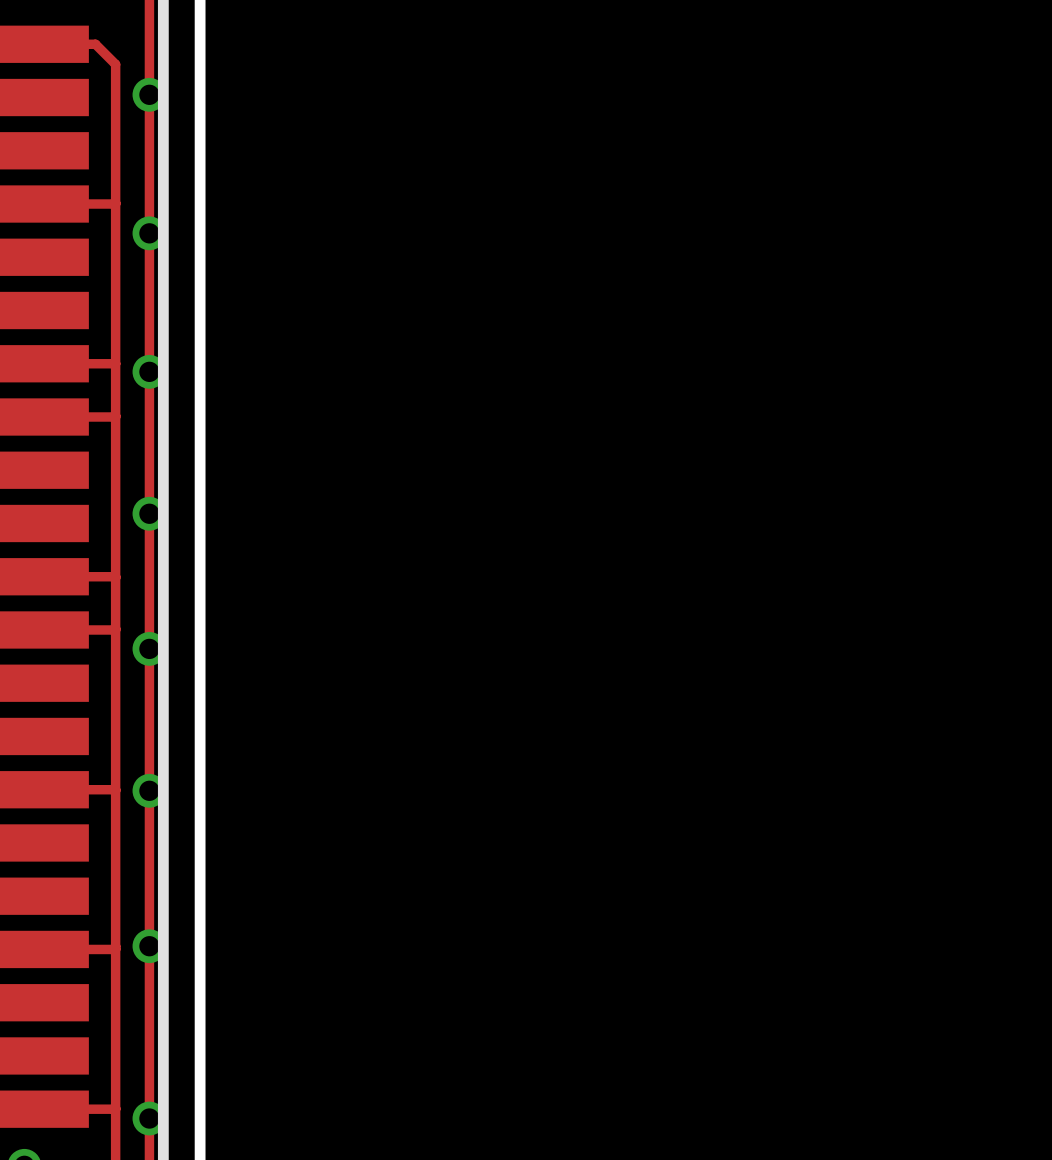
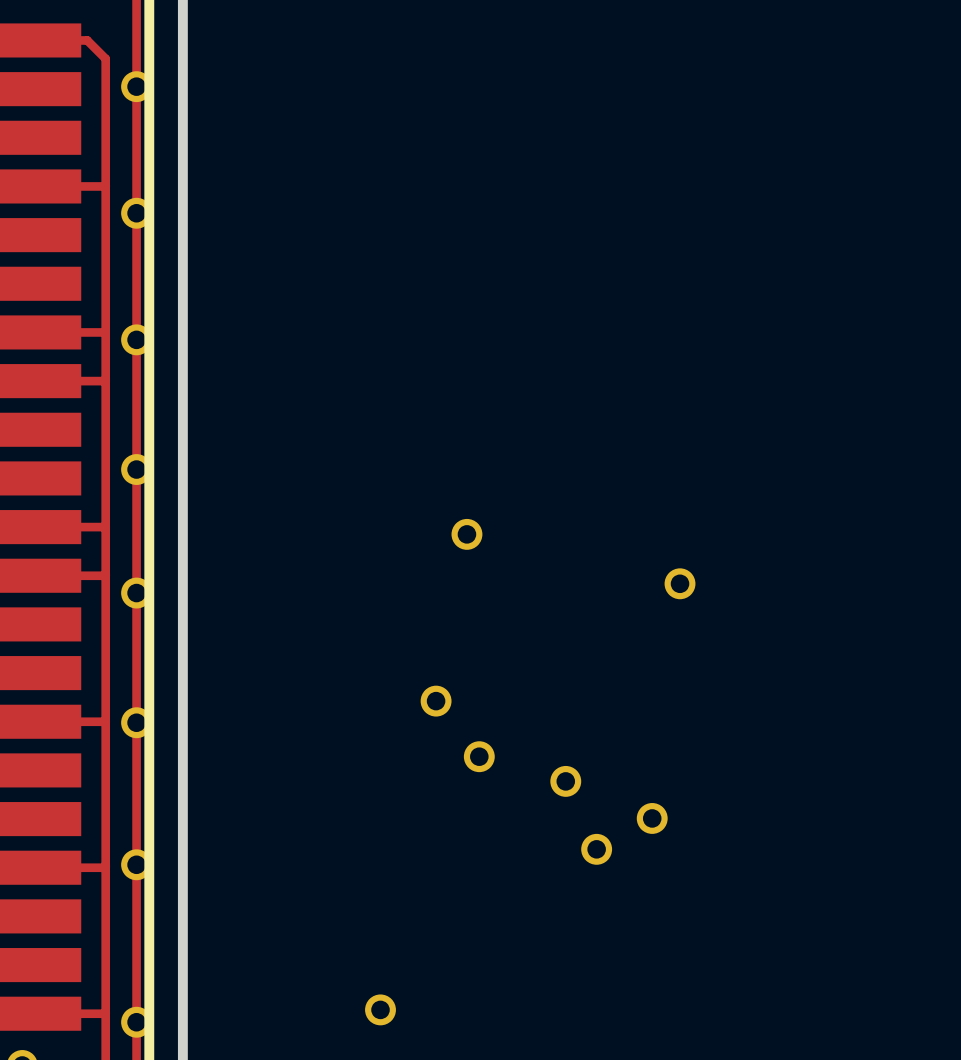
part: none -> (466, 534)
part: none -> (680, 583)
part: none -> (436, 701)
part: none -> (479, 756)
part: none -> (565, 781)
part: none -> (652, 818)
part: none -> (596, 849)
part: none -> (380, 1009)

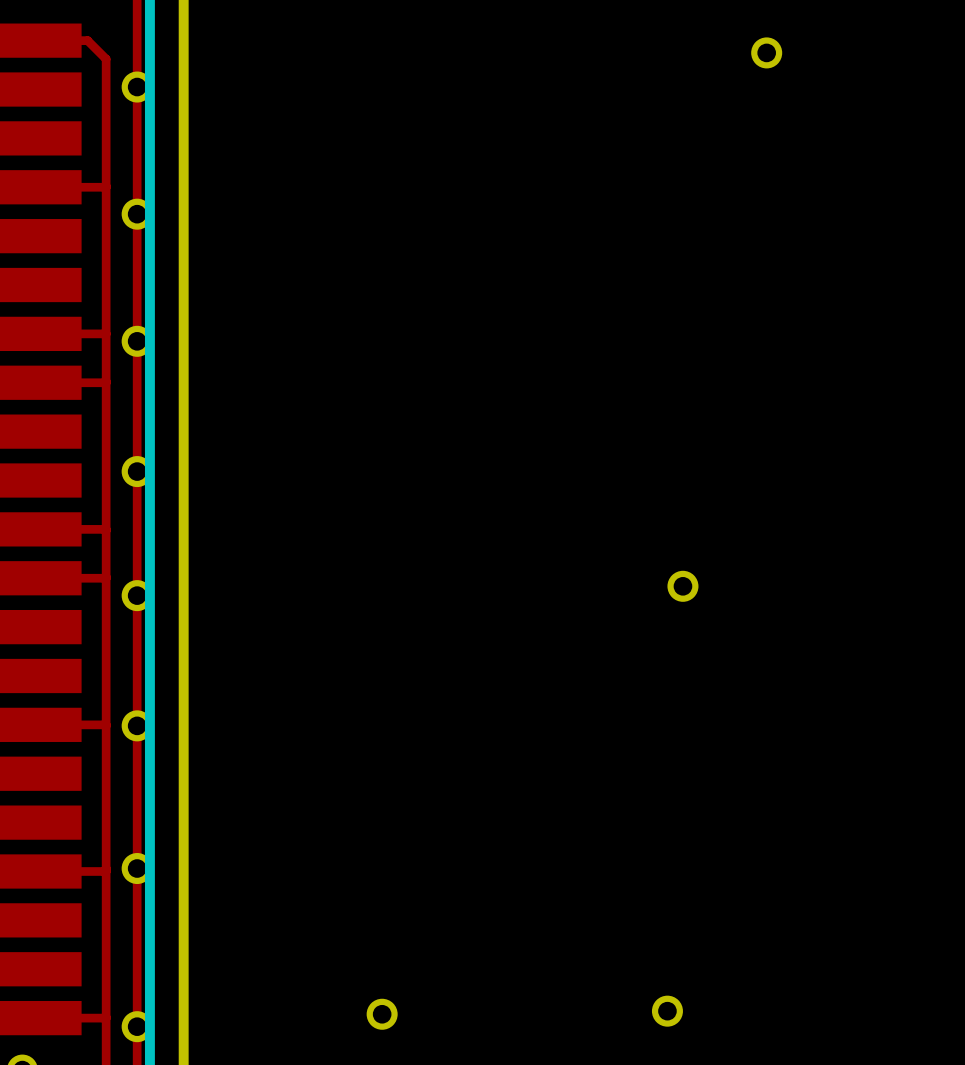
part: none -> (766, 52)
part: (466, 534) -> none
part: (436, 701) -> none
part: (479, 756) -> none
part: (565, 781) -> none
part: (652, 818) -> none
part: (596, 849) -> none
part: none -> (667, 1011)

